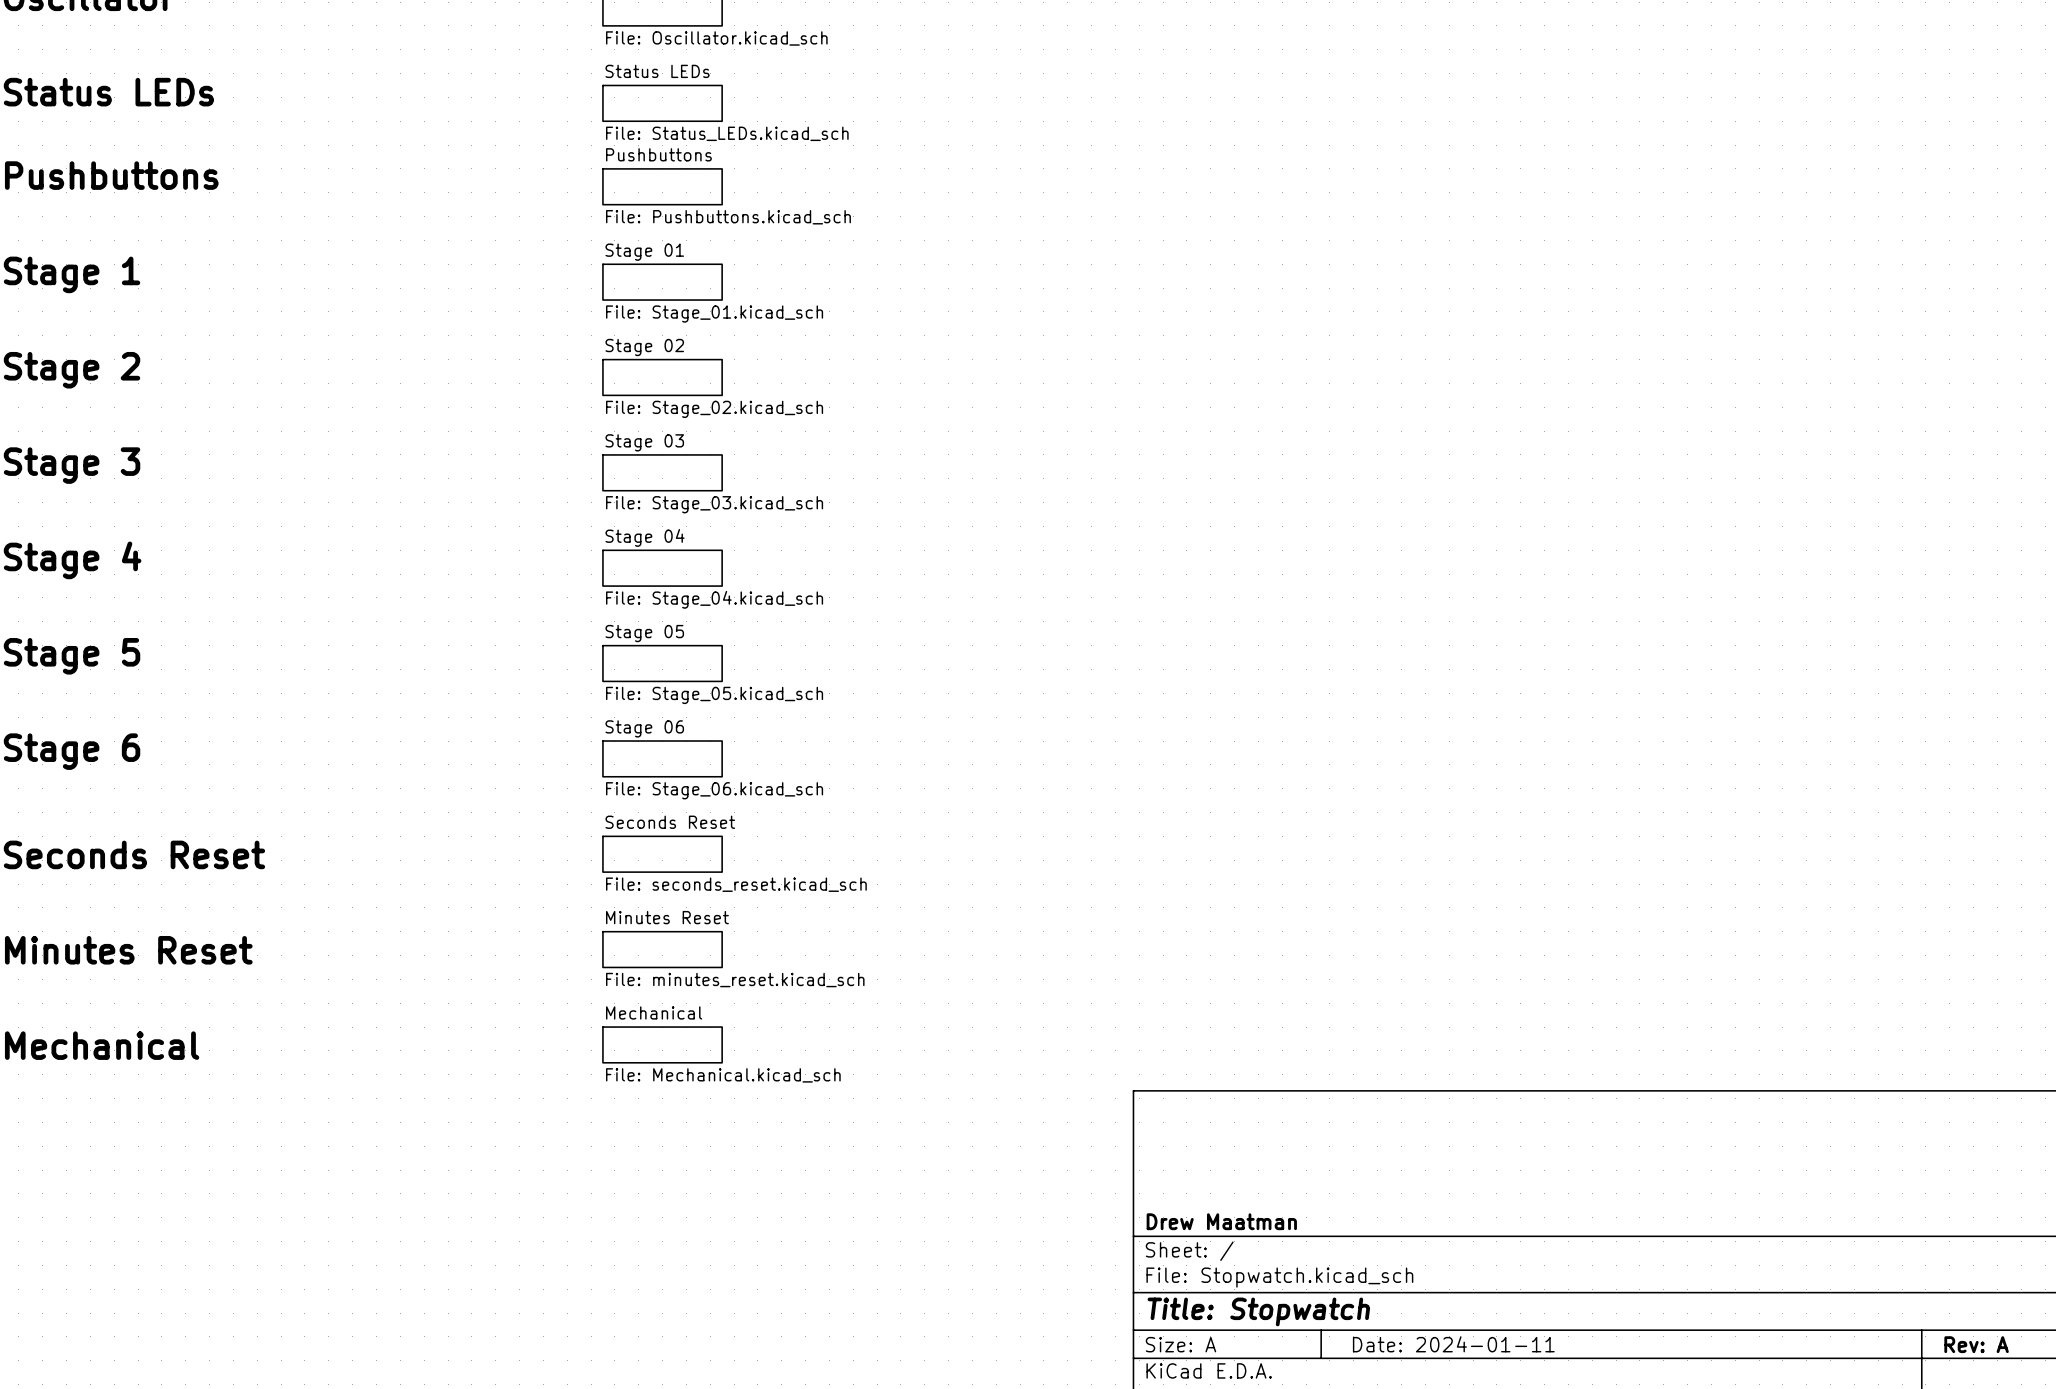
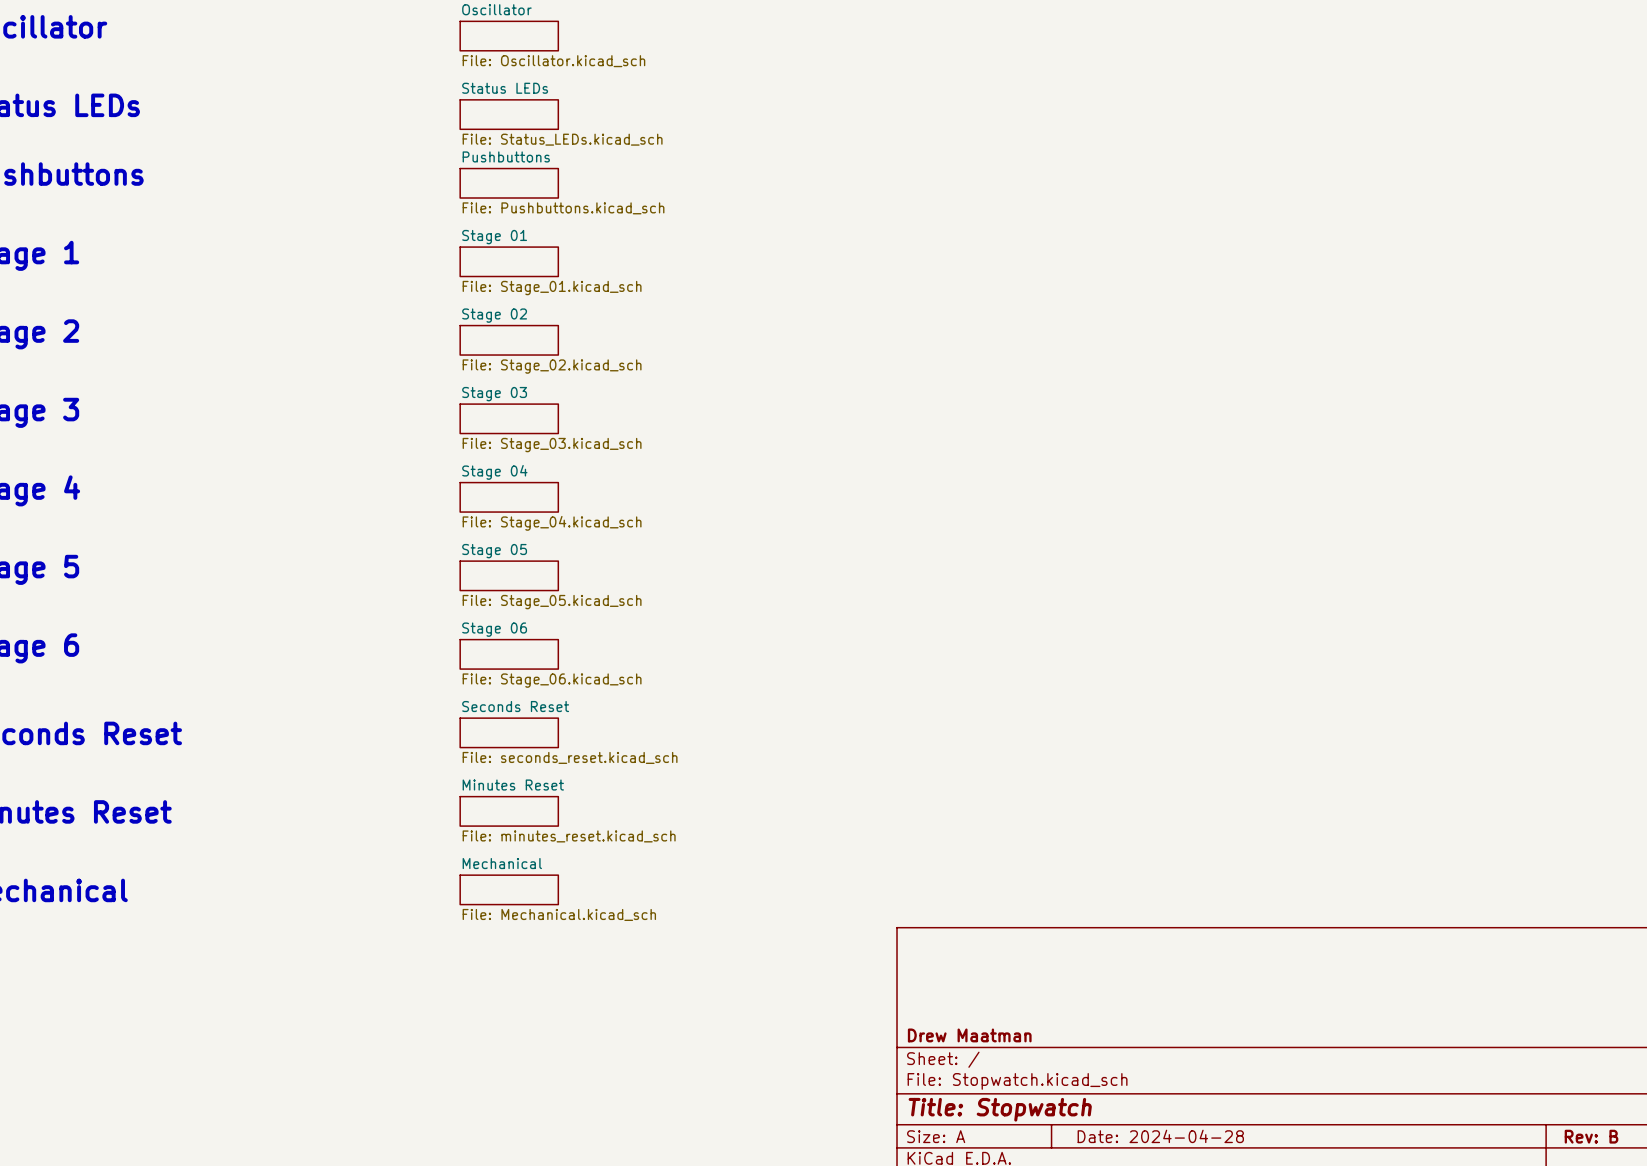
title block: Date: 2024-01-11 (1453, 1344) -> Date: 2024-04-28 (1160, 1136)
title block: Rev: A (1976, 1344) -> Rev: B (1591, 1136)

